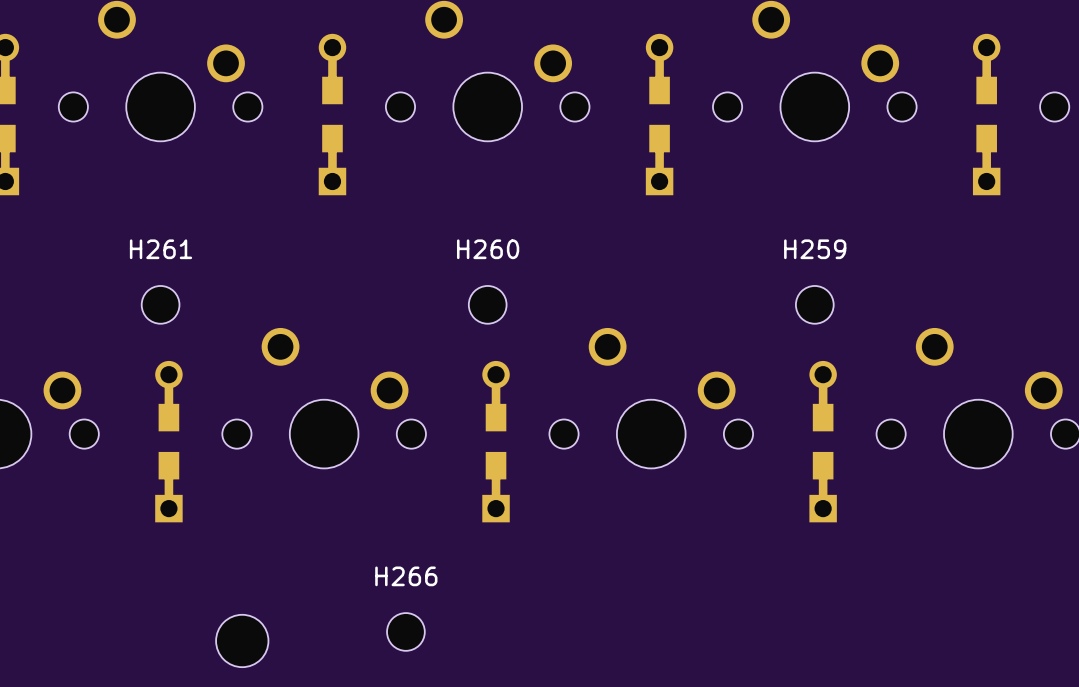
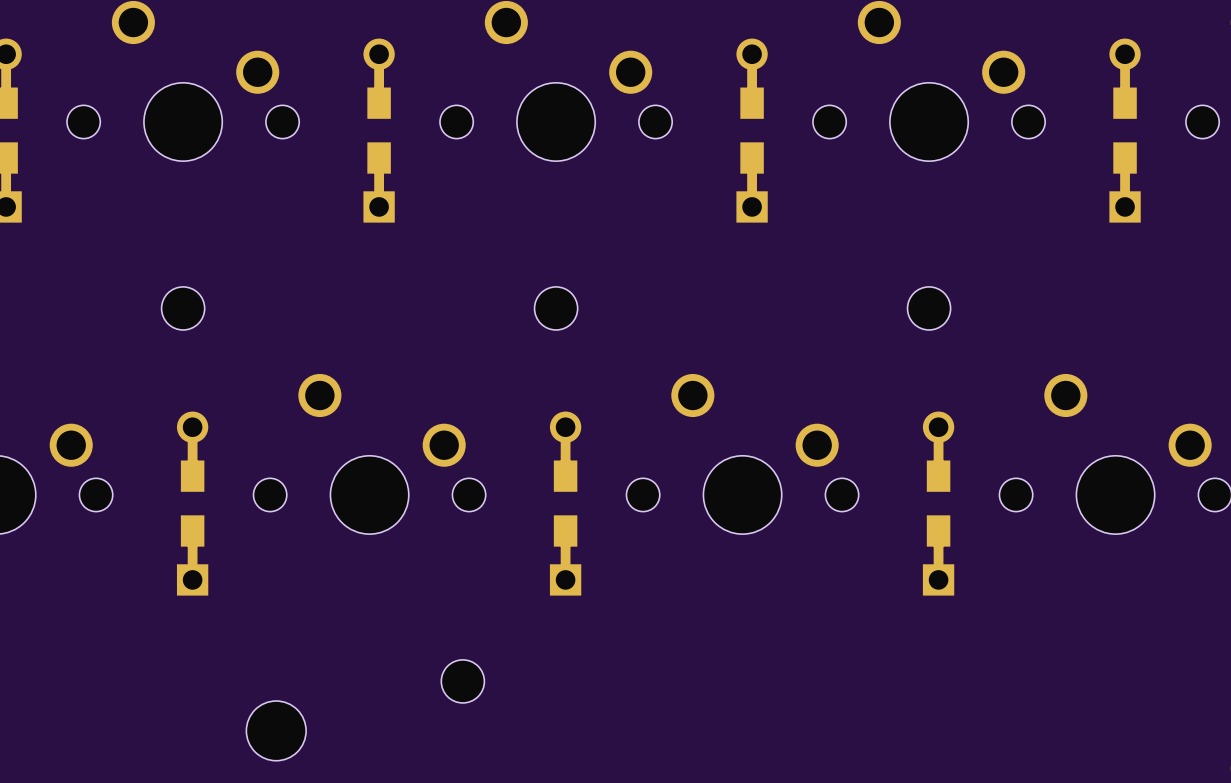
H261 position: (160, 304) -> (183, 308)
H260 position: (487, 304) -> (556, 308)
H259 position: (814, 304) -> (929, 308)
H266 position: (405, 631) -> (462, 681)

